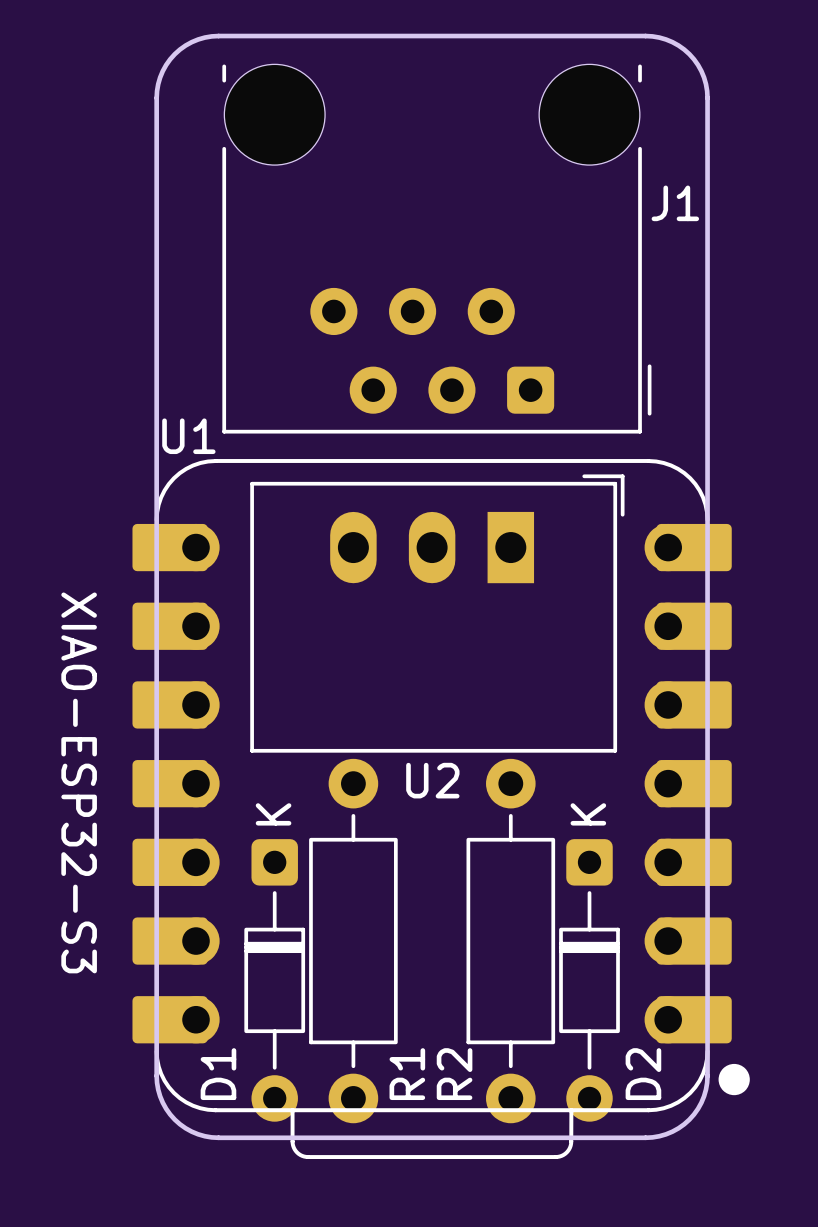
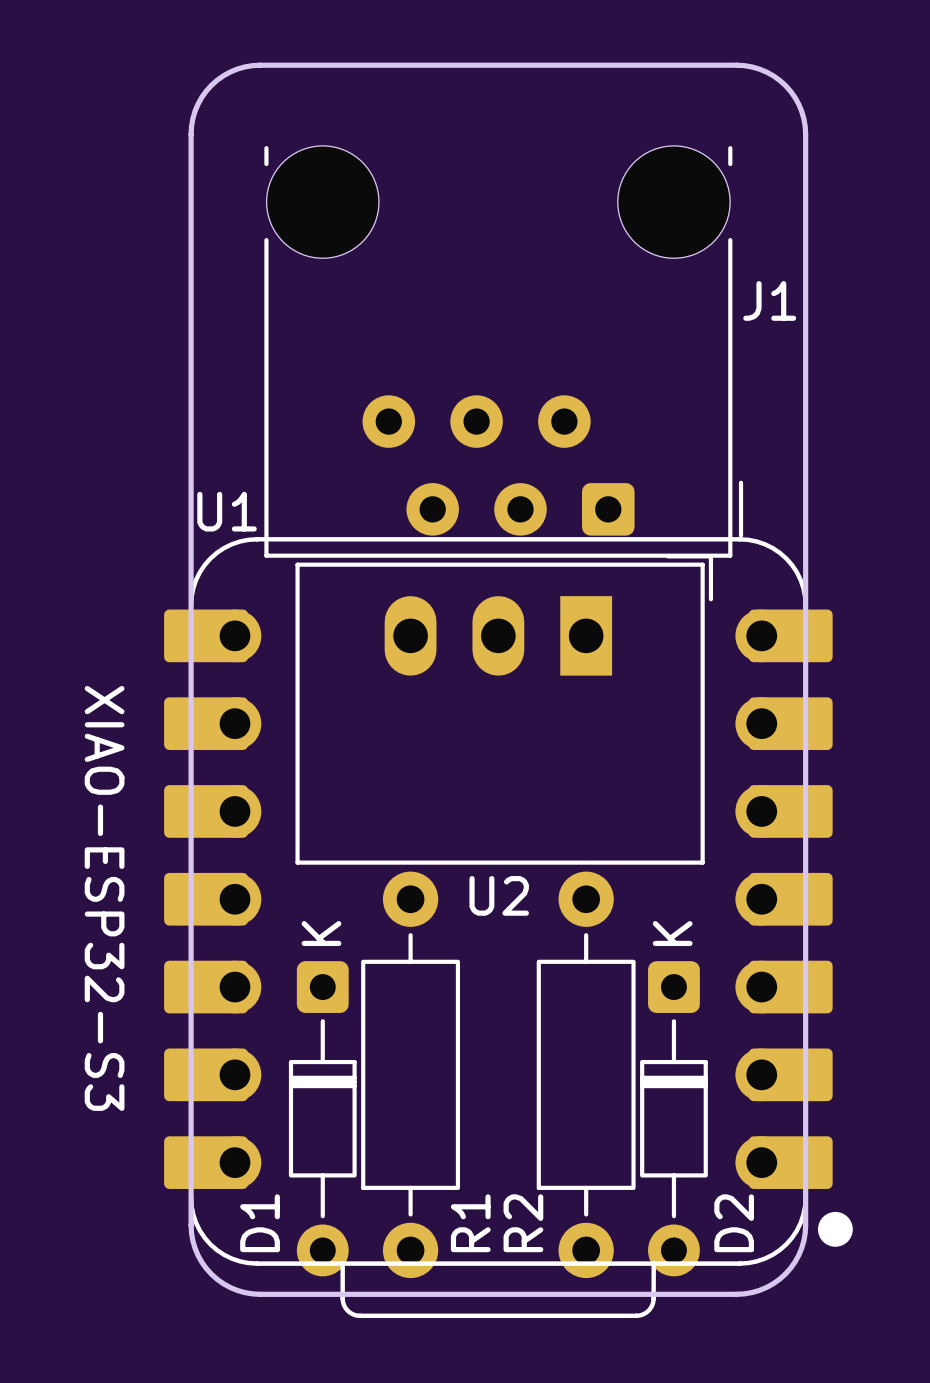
J1 position: (436, 248) -> (503, 351)

